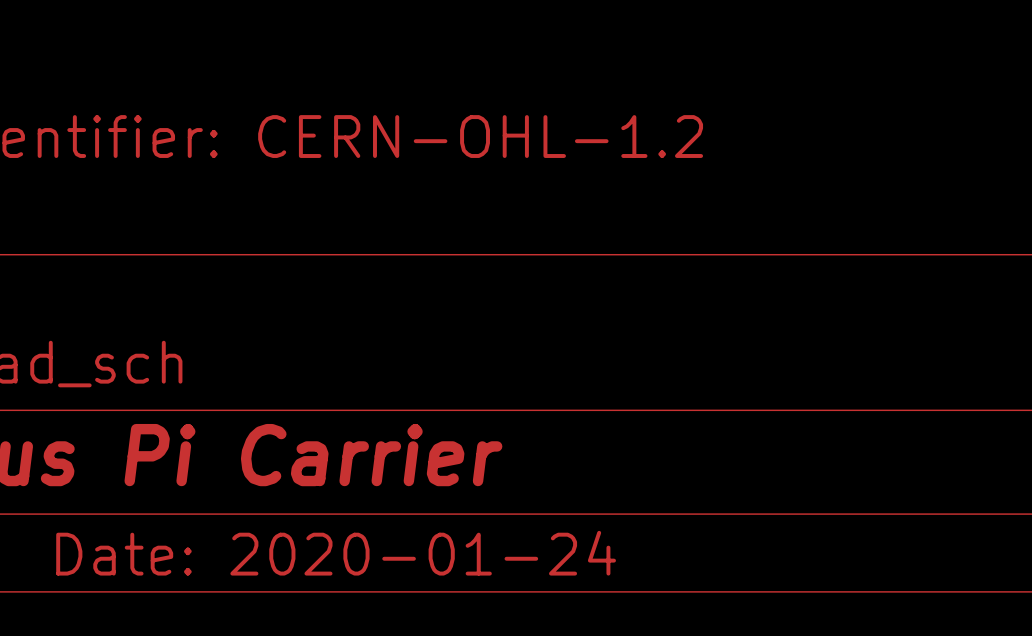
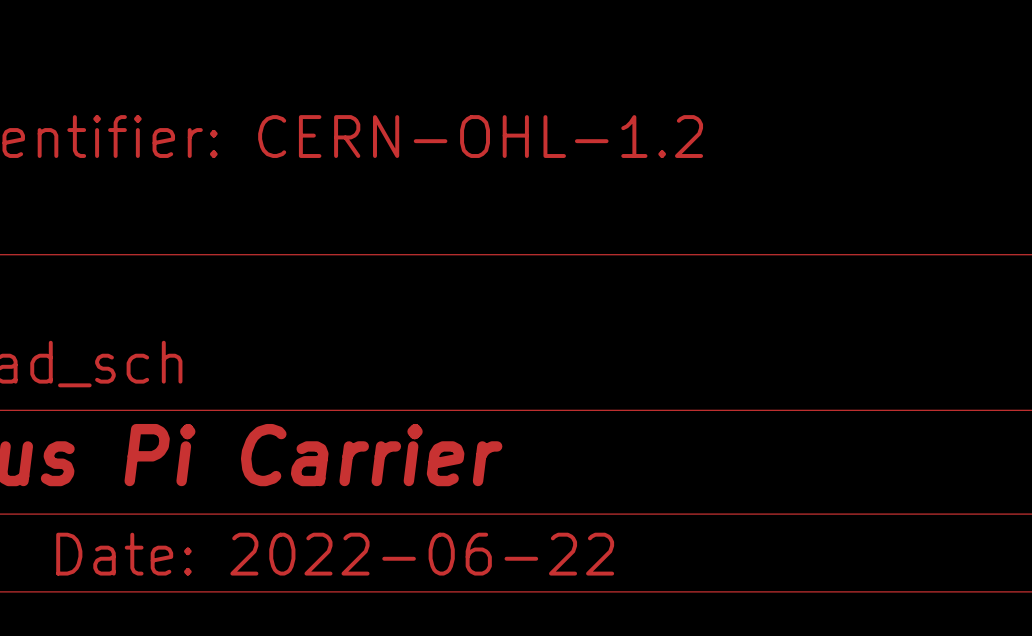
title block: Date: 2020-01-24 (336, 553) -> Date: 2022-06-22 (335, 554)

